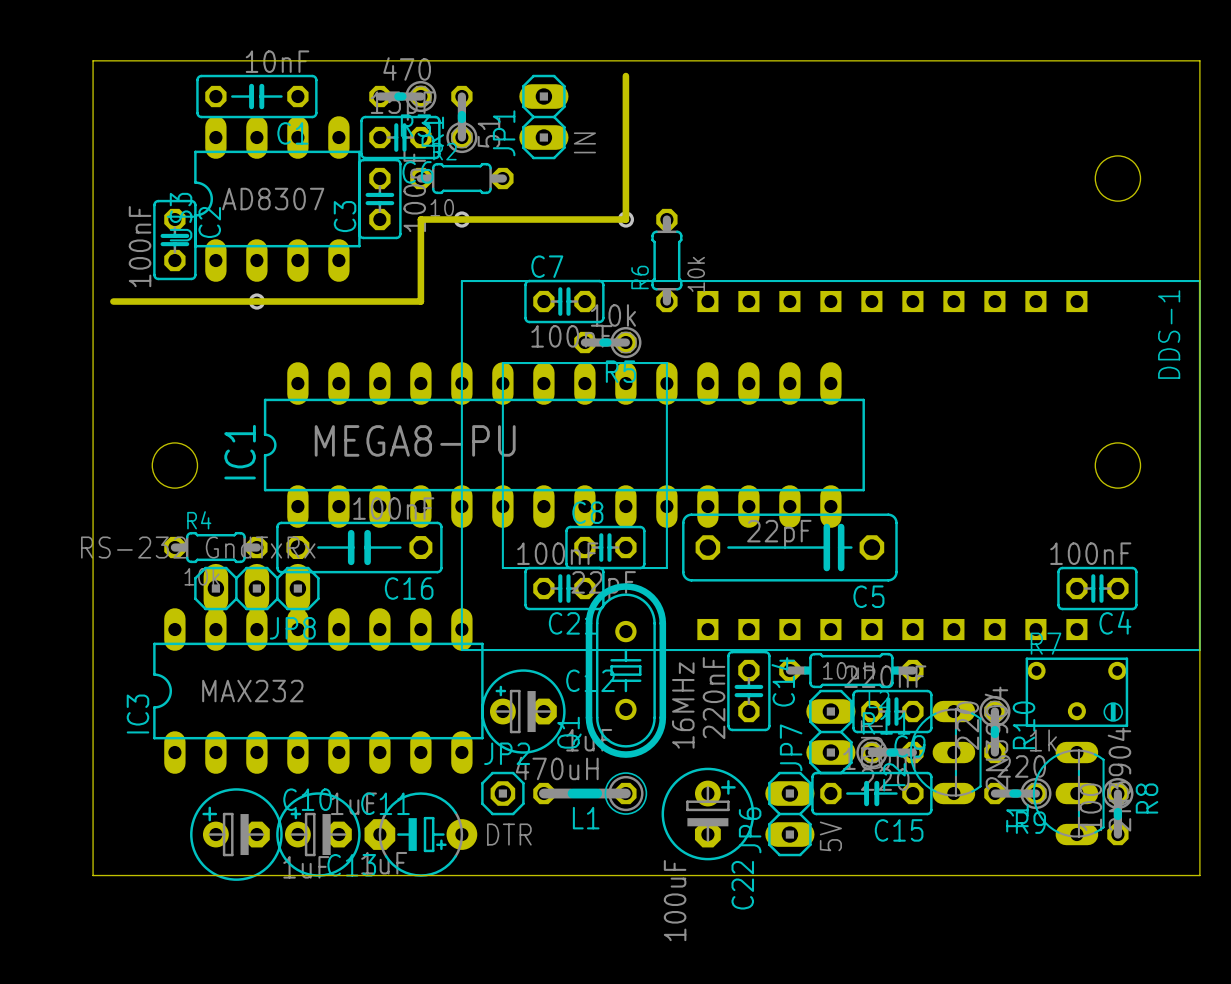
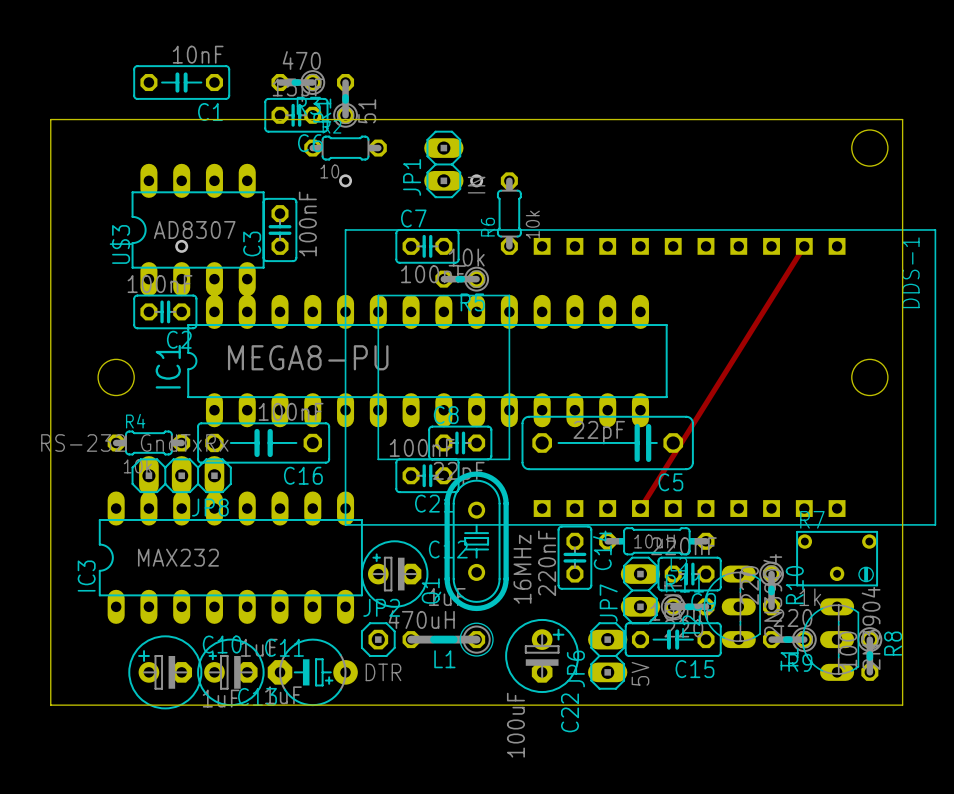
board edge: (625, 76) (625, 219) (420, 219) (420, 301) (113, 301) -> none
JP1 position: (543, 117) -> (443, 164)
board edge: (93, 142) (93, 60) (1199, 60) (1199, 875) (1158, 875) -> (50, 119) (902, 119) (902, 705)
U$3 position: (277, 199) -> (198, 229)
C3 position: (379, 199) -> (280, 229)
C2 rotation: 0° (174, 240) -> 90° clockwise (165, 311)
C2 position: (174, 240) -> (165, 311)
track: none -> (804, 246) (640, 508)
C4: 100nF (1097, 588) -> none

